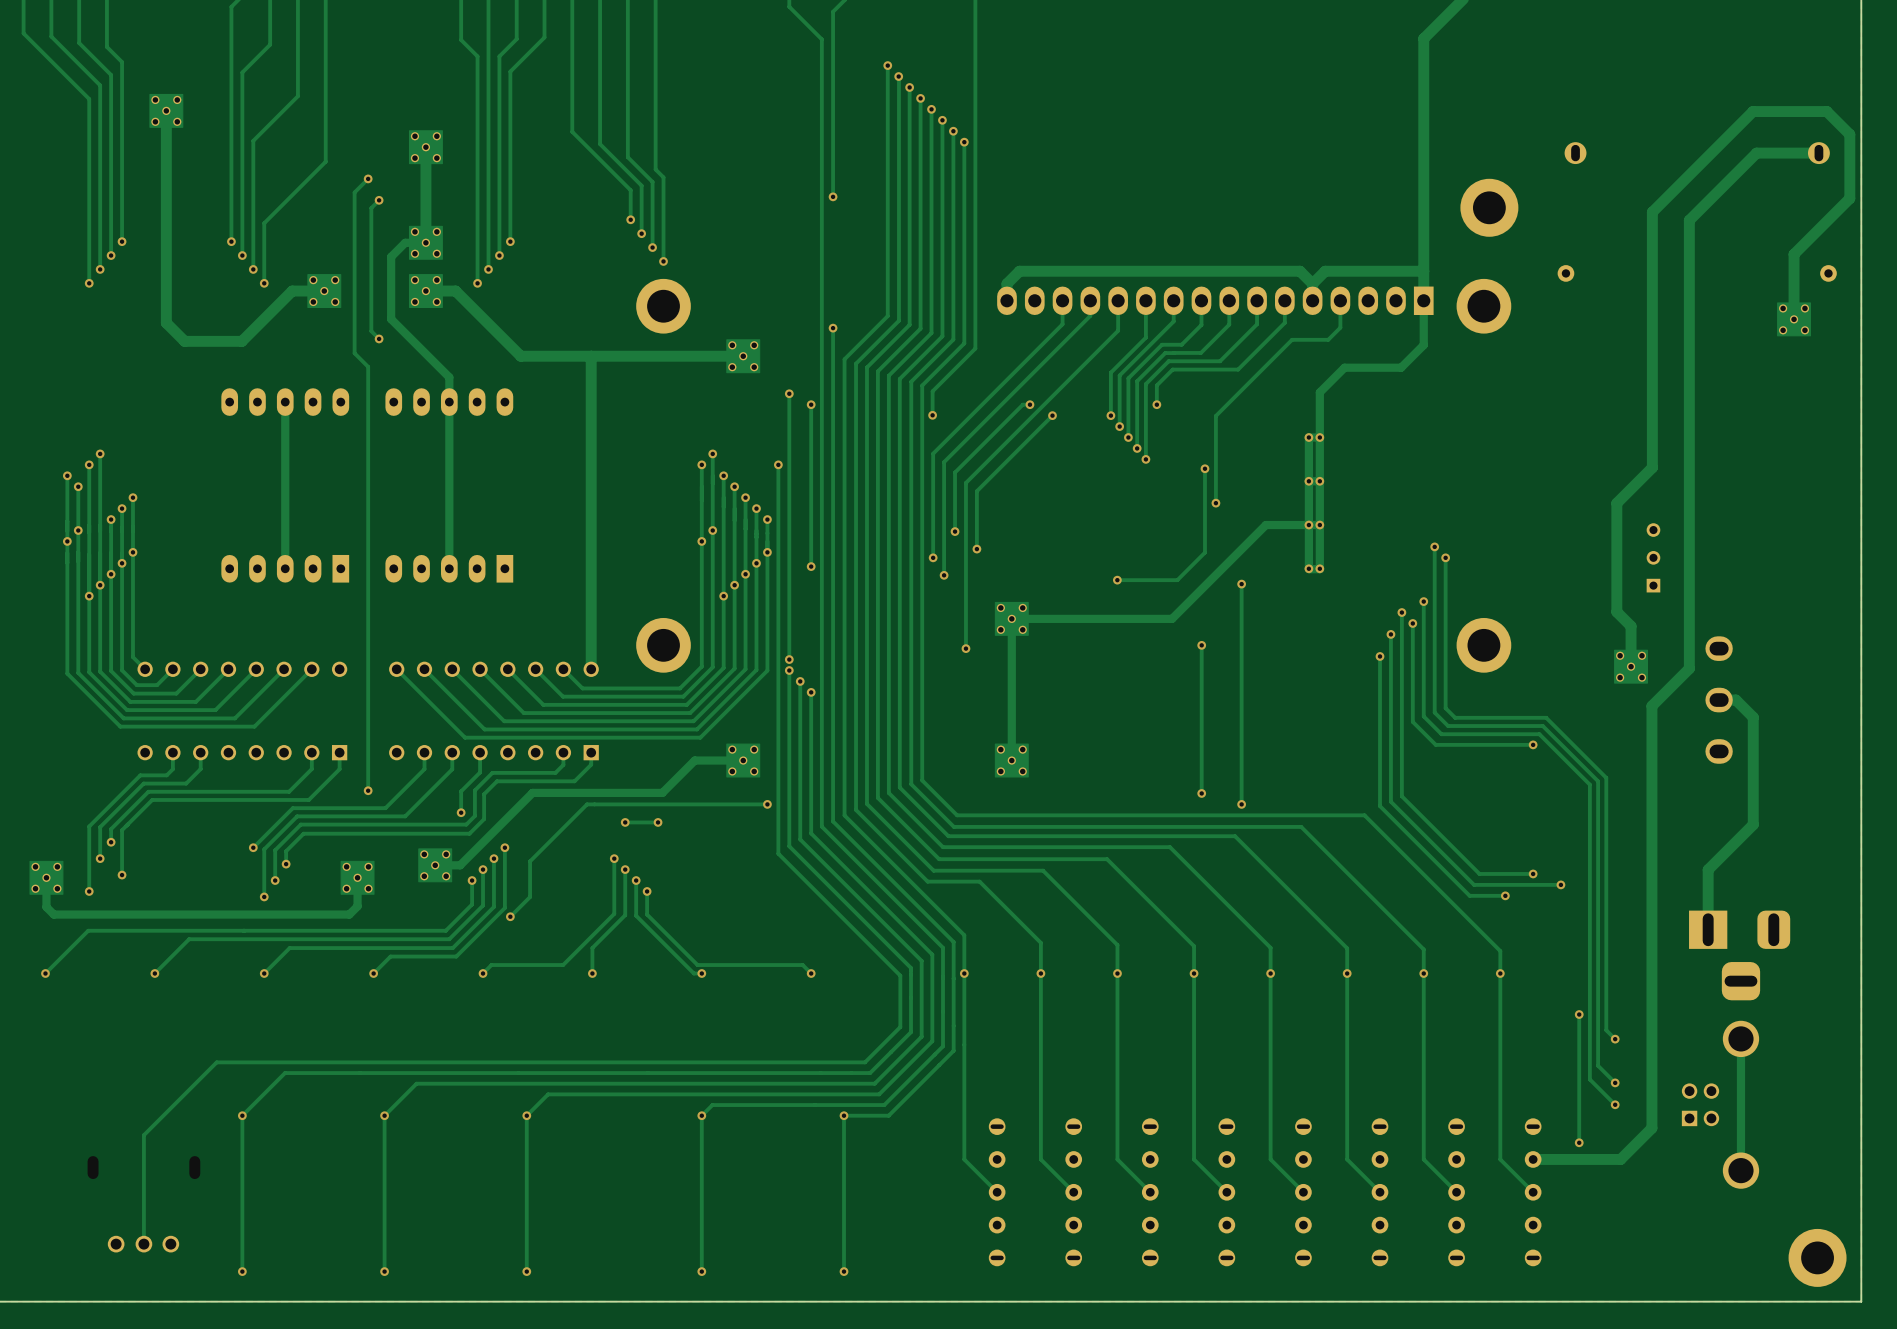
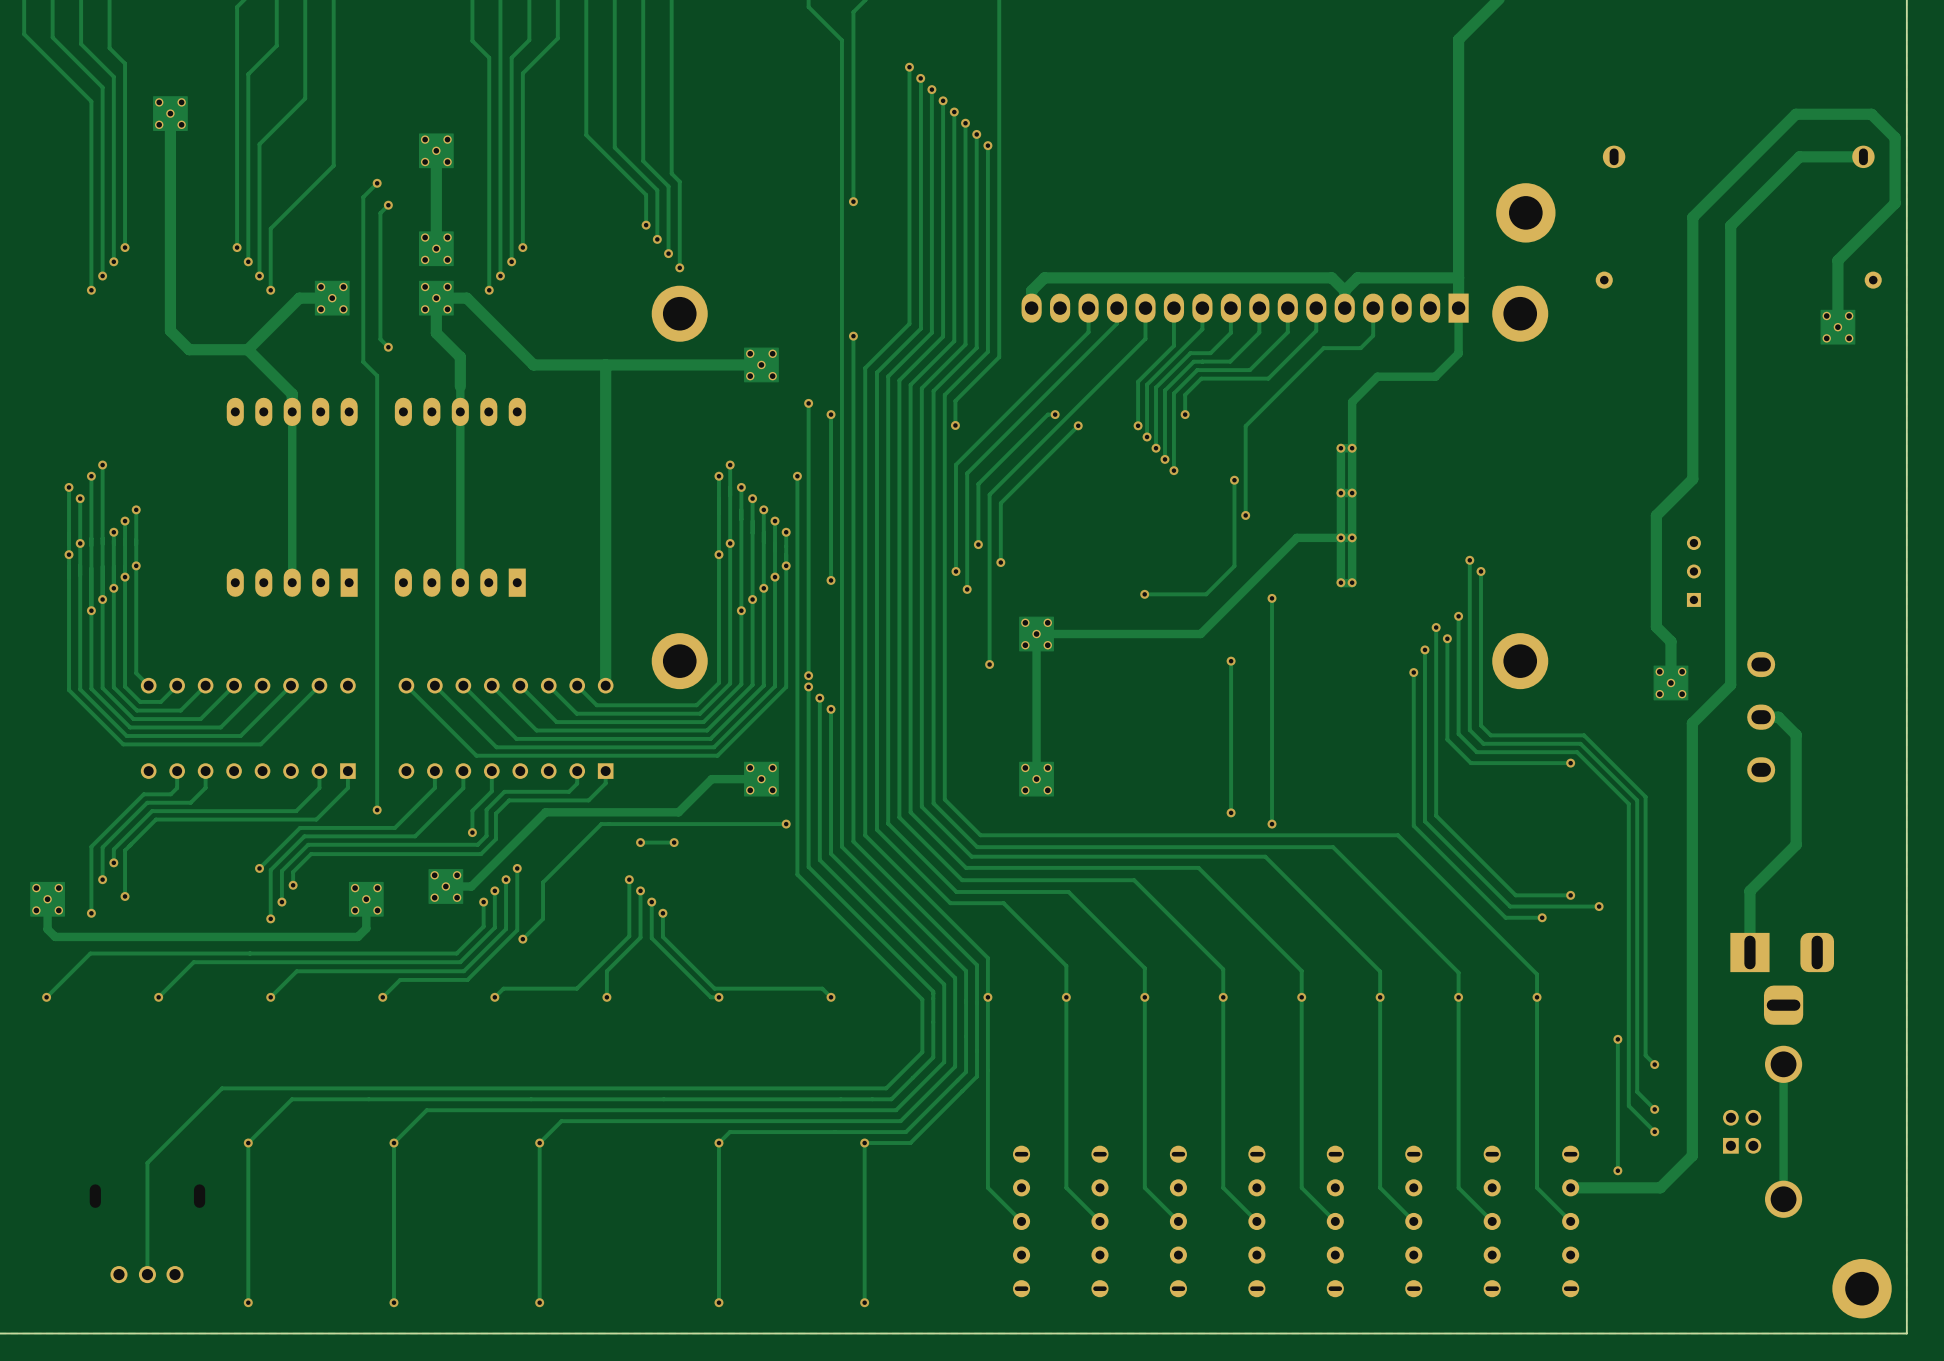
track: (425, 242) (405, 242) (391, 256) (391, 319) (449, 377) -> (436, 298) (436, 333) (460, 357) (460, 386)
track: none -> (247, 349) (292, 394) (292, 411)

